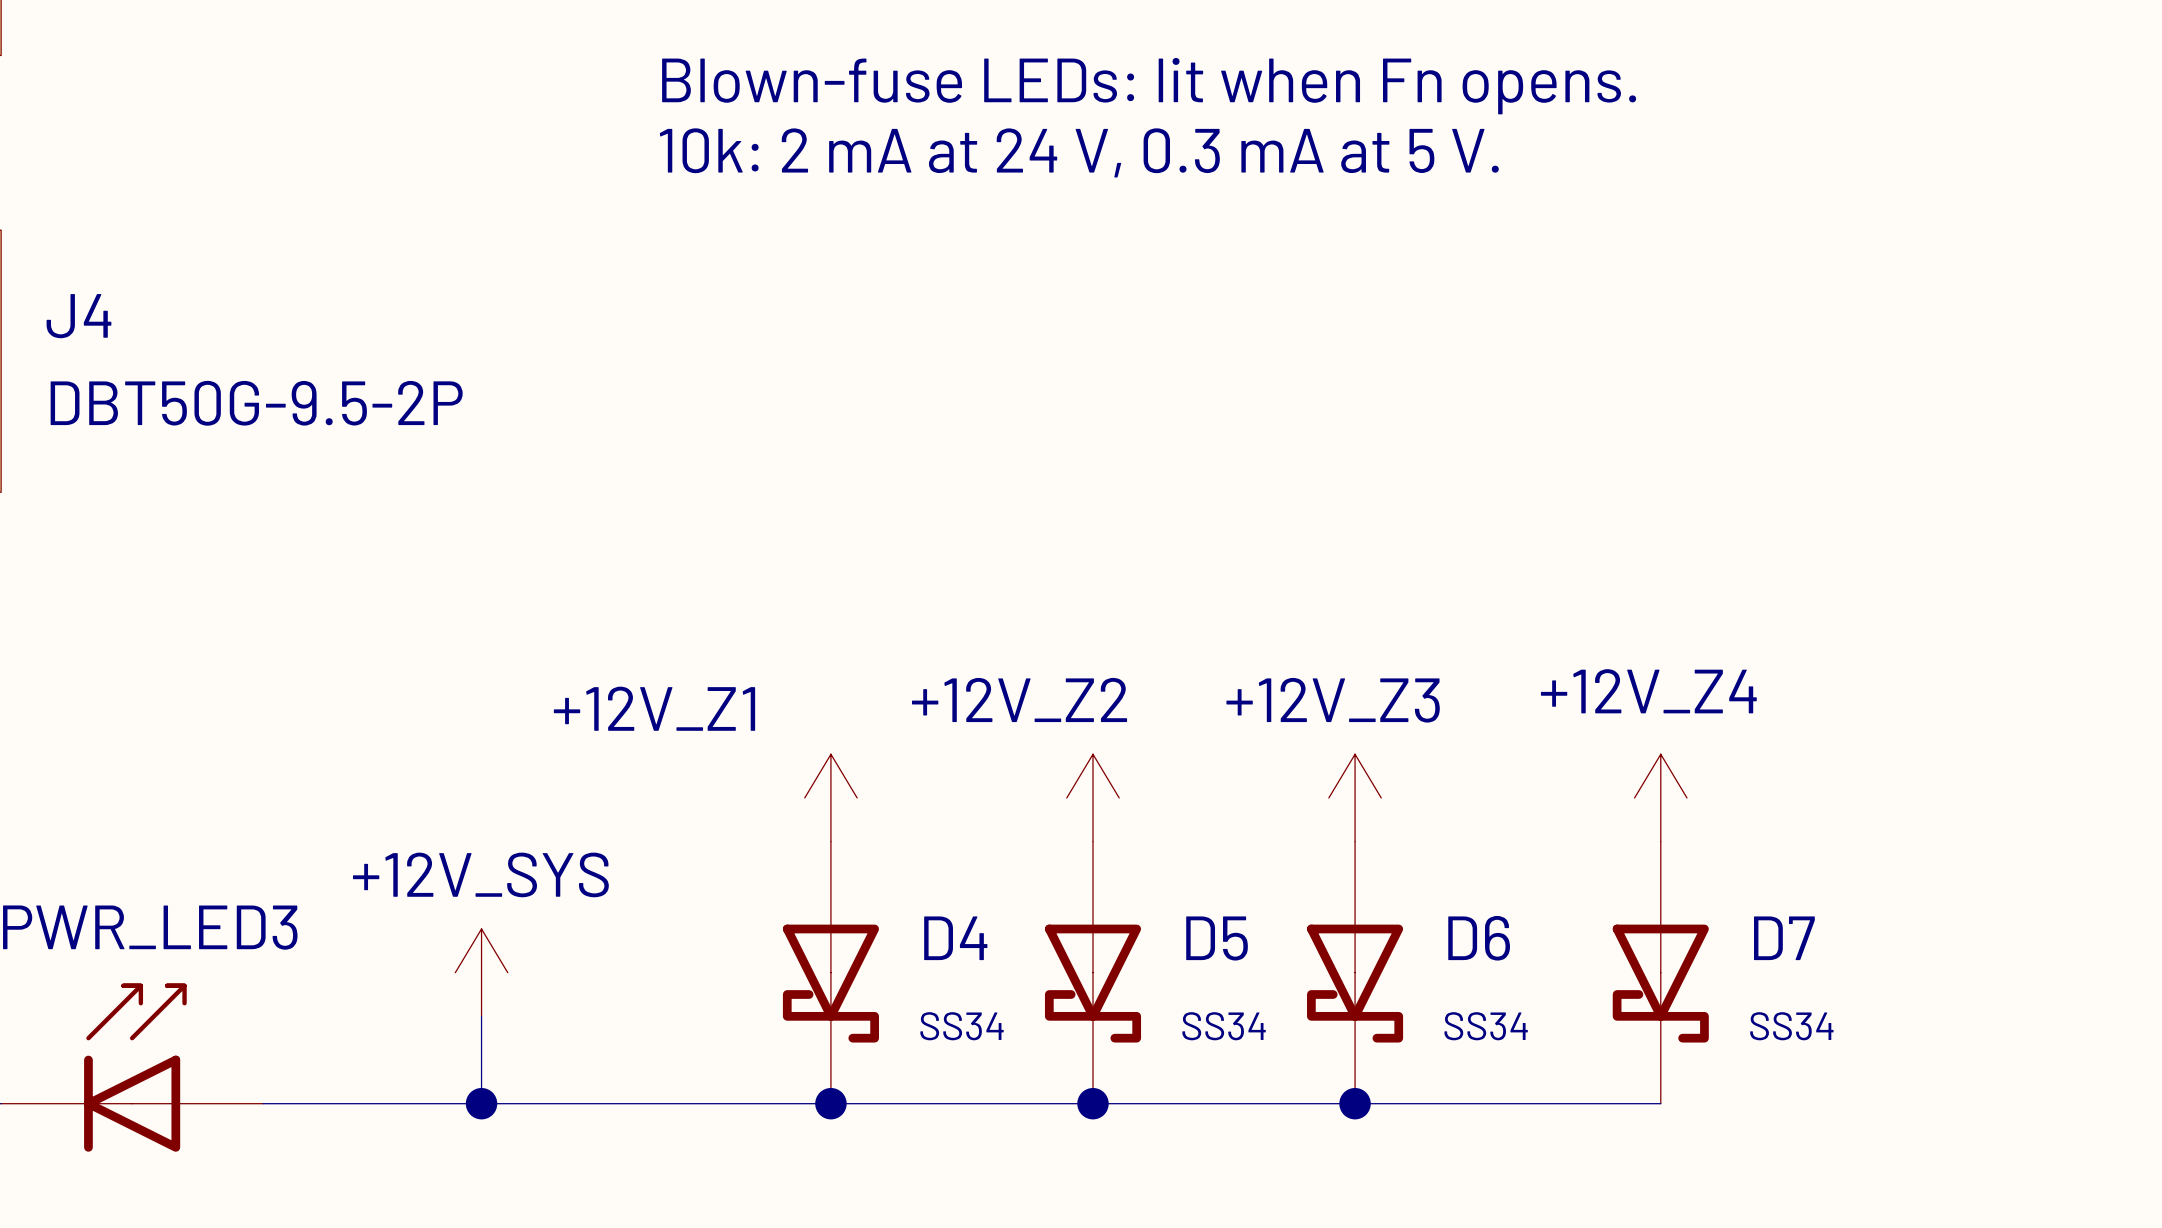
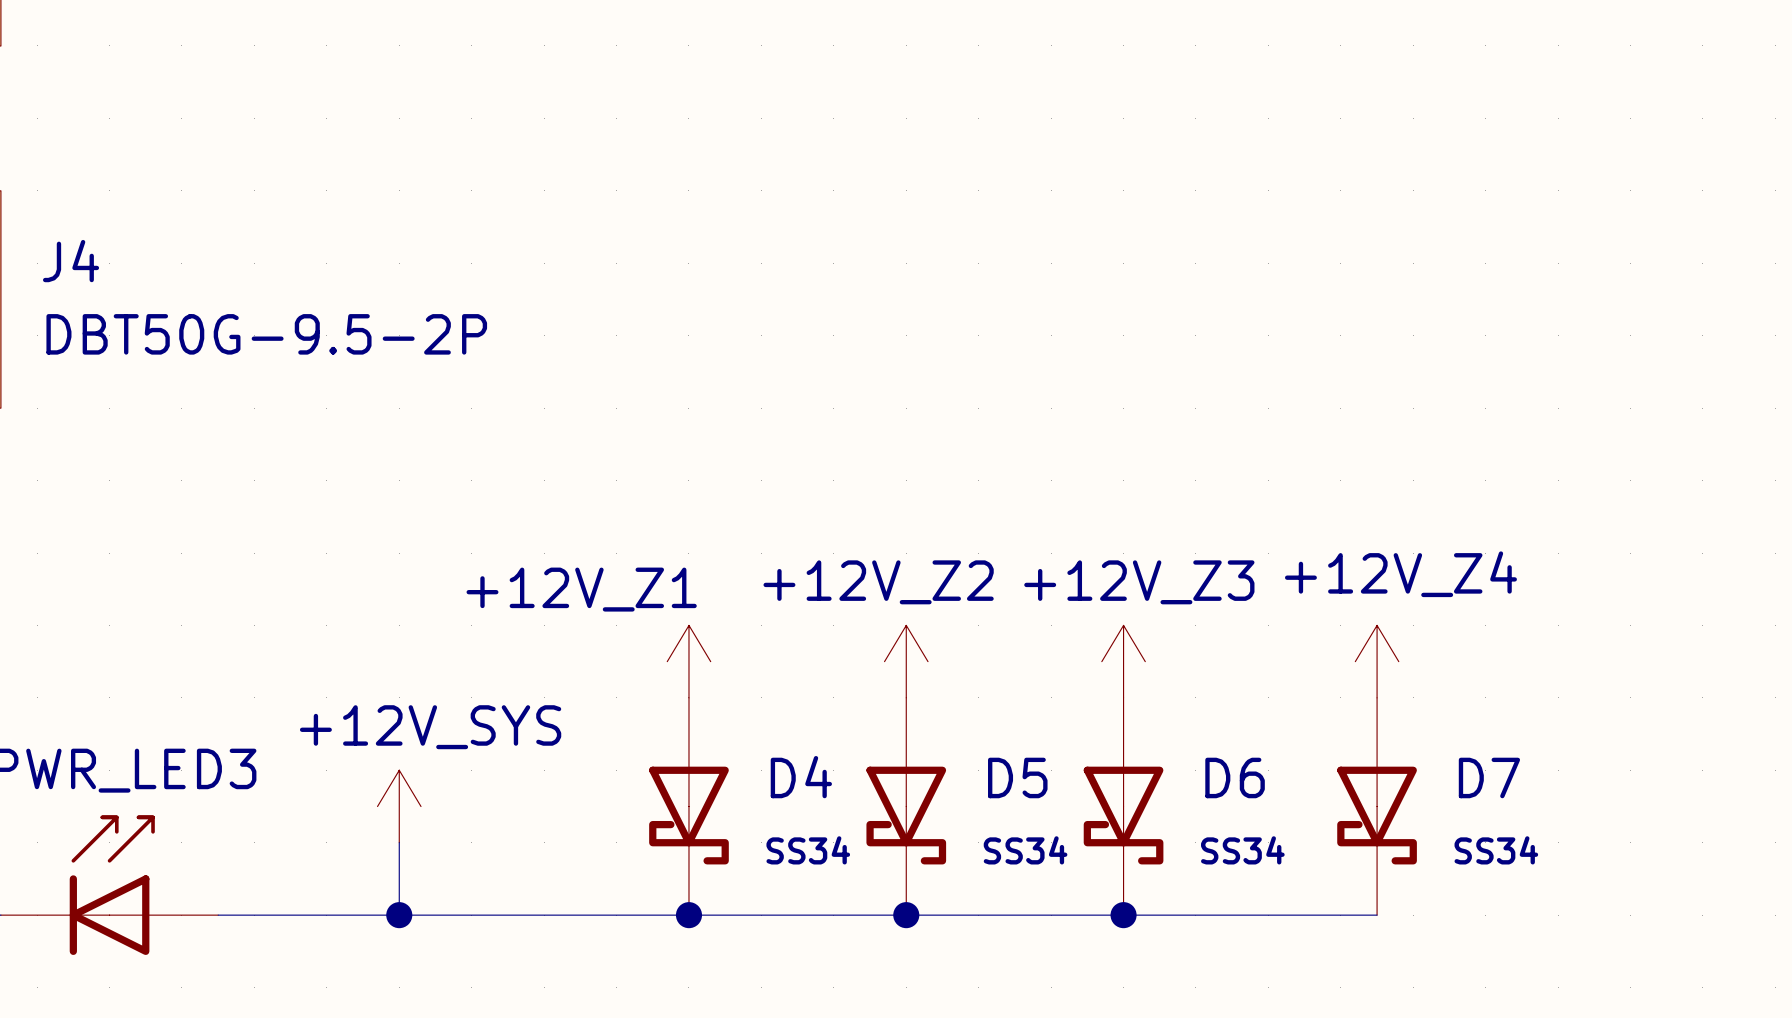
text: Blown-fuse LEDs: lit when Fn opens. (1149, 86) -> none
text: 10k: 2 mA at 24 V, 0.3 mA at 5 V. (1079, 152) -> none

